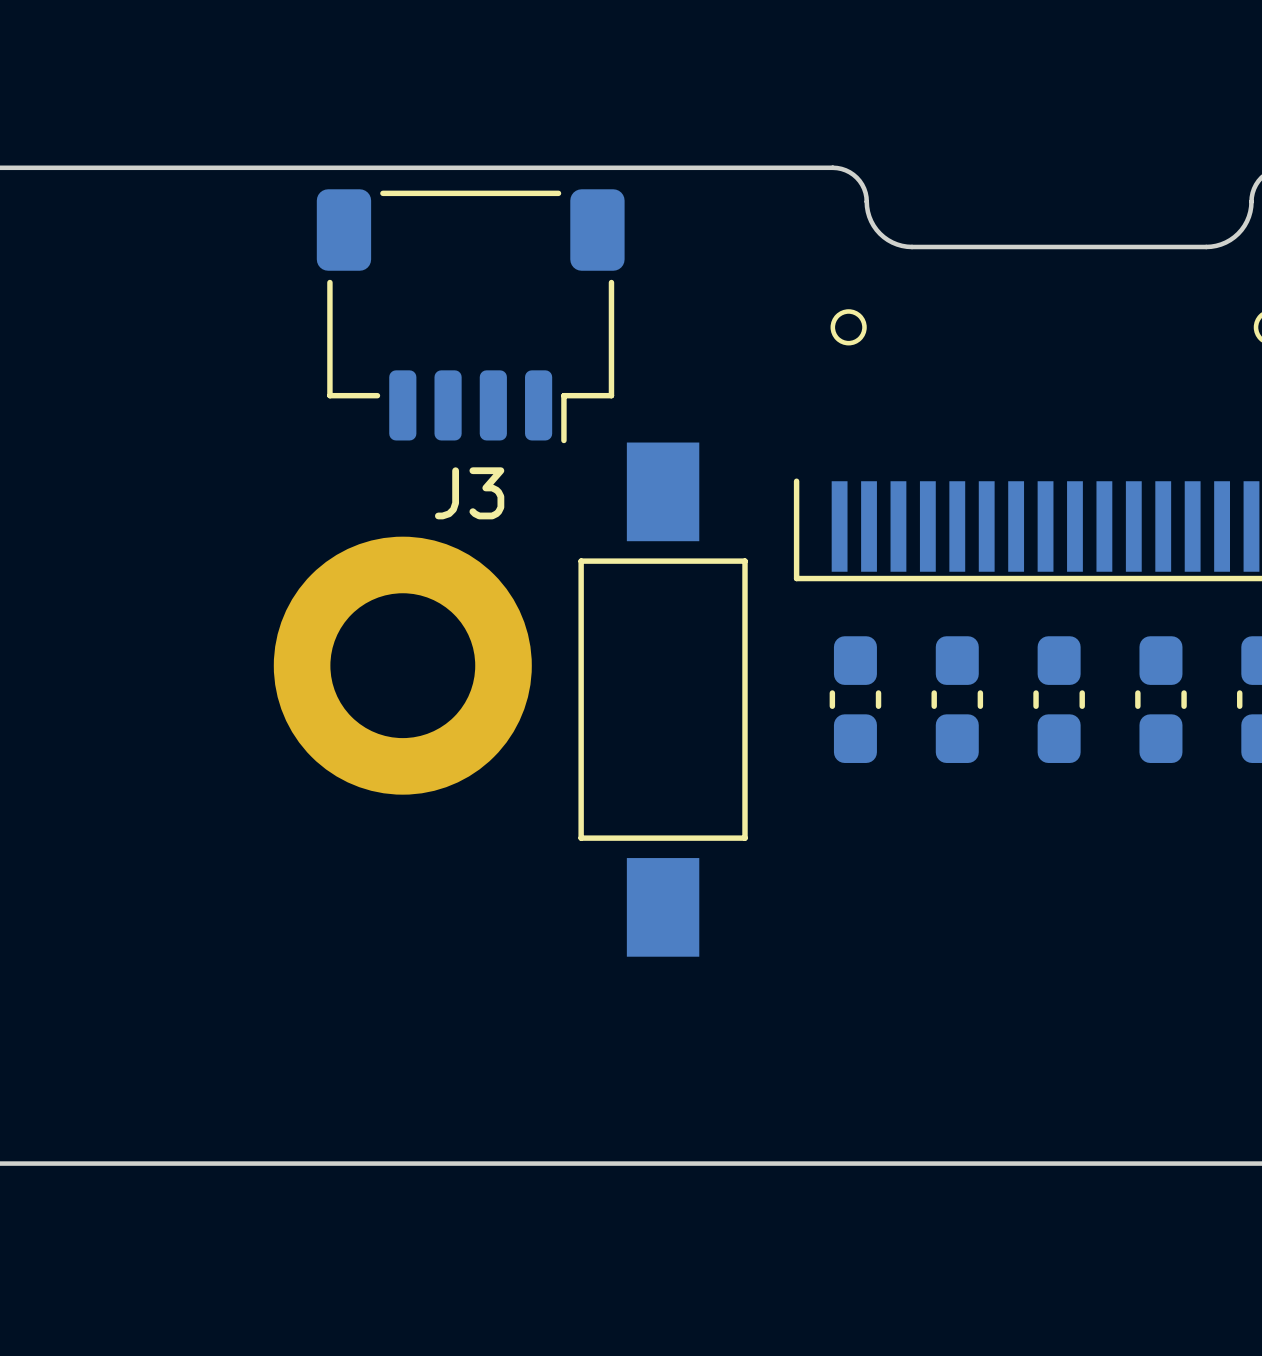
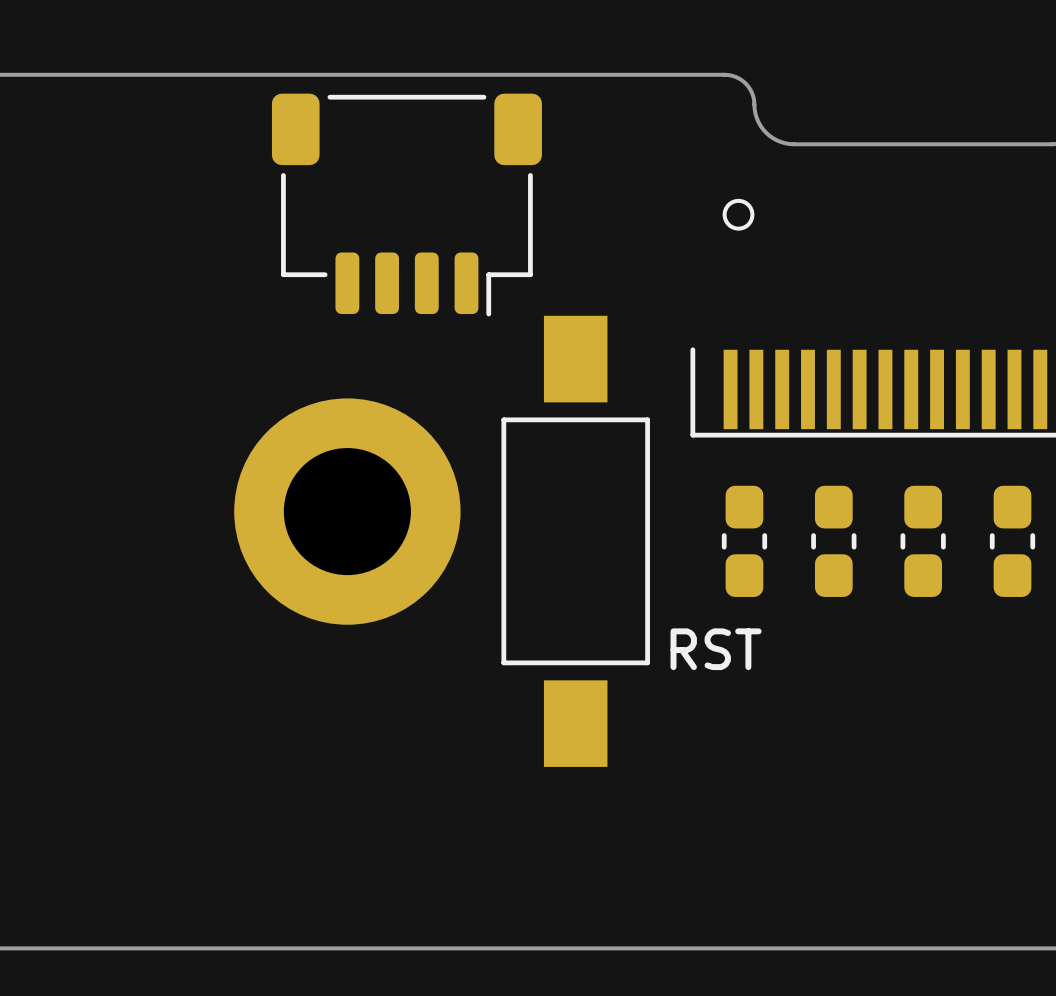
J3 name: J3 (469, 493) -> none
text: none -> RST (716, 649)

